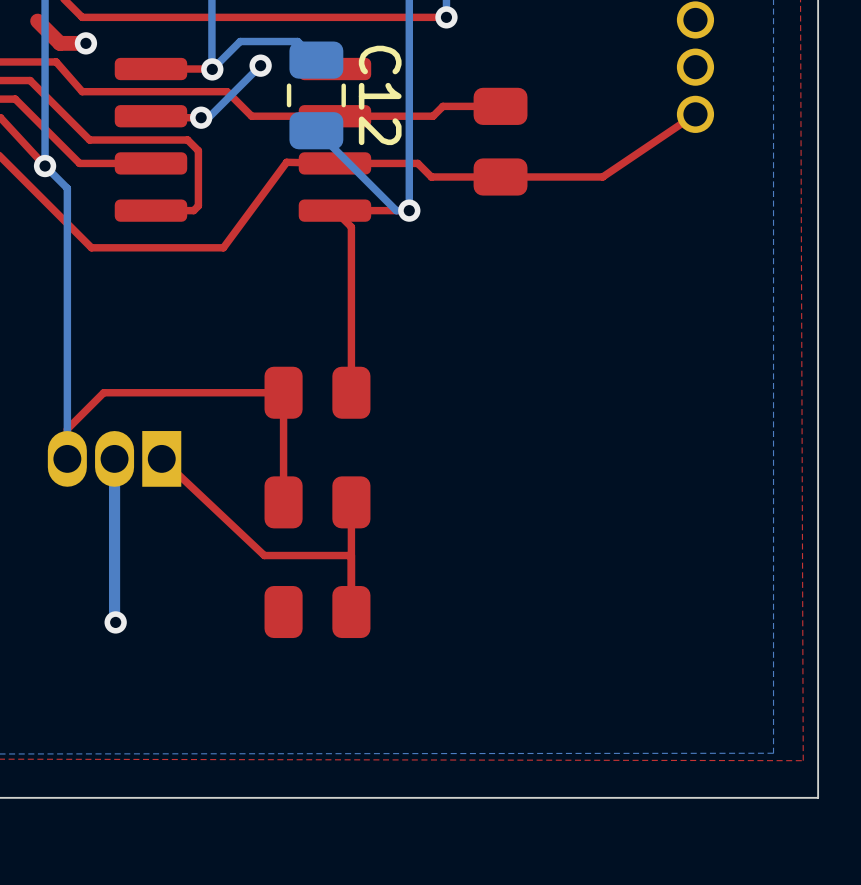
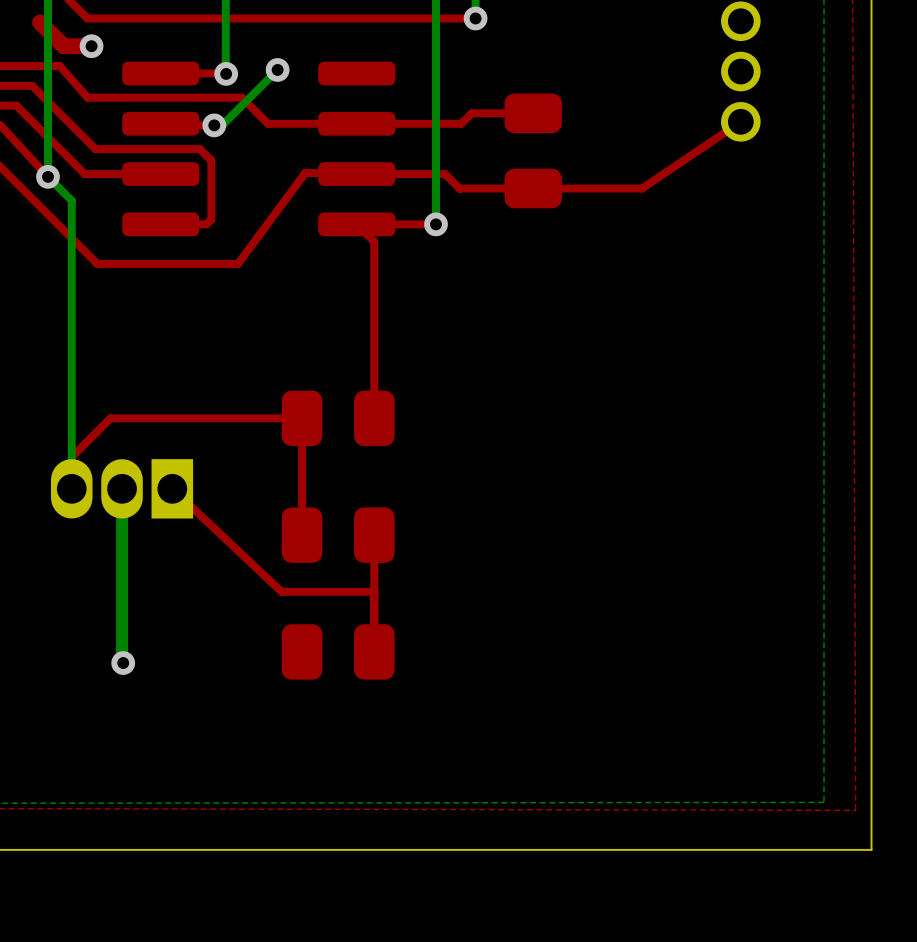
bottom track: (316, 60) (297, 41) (240, 41) (212, 69) -> none
C12: (316, 95) -> none
bottom track: (316, 130) (396, 210) (409, 210) -> none

